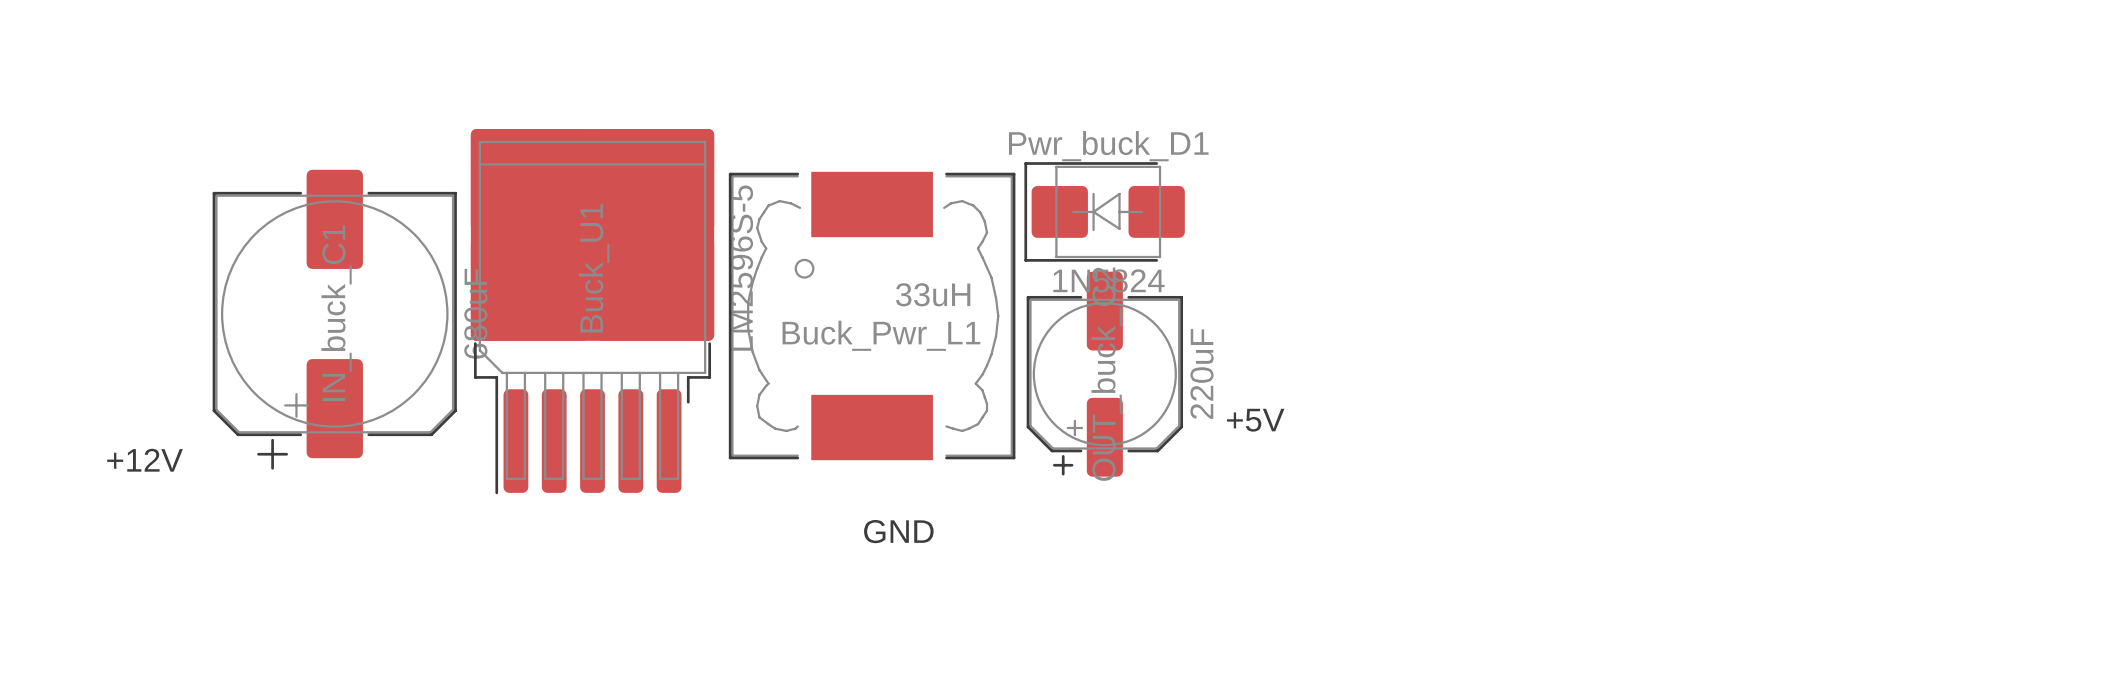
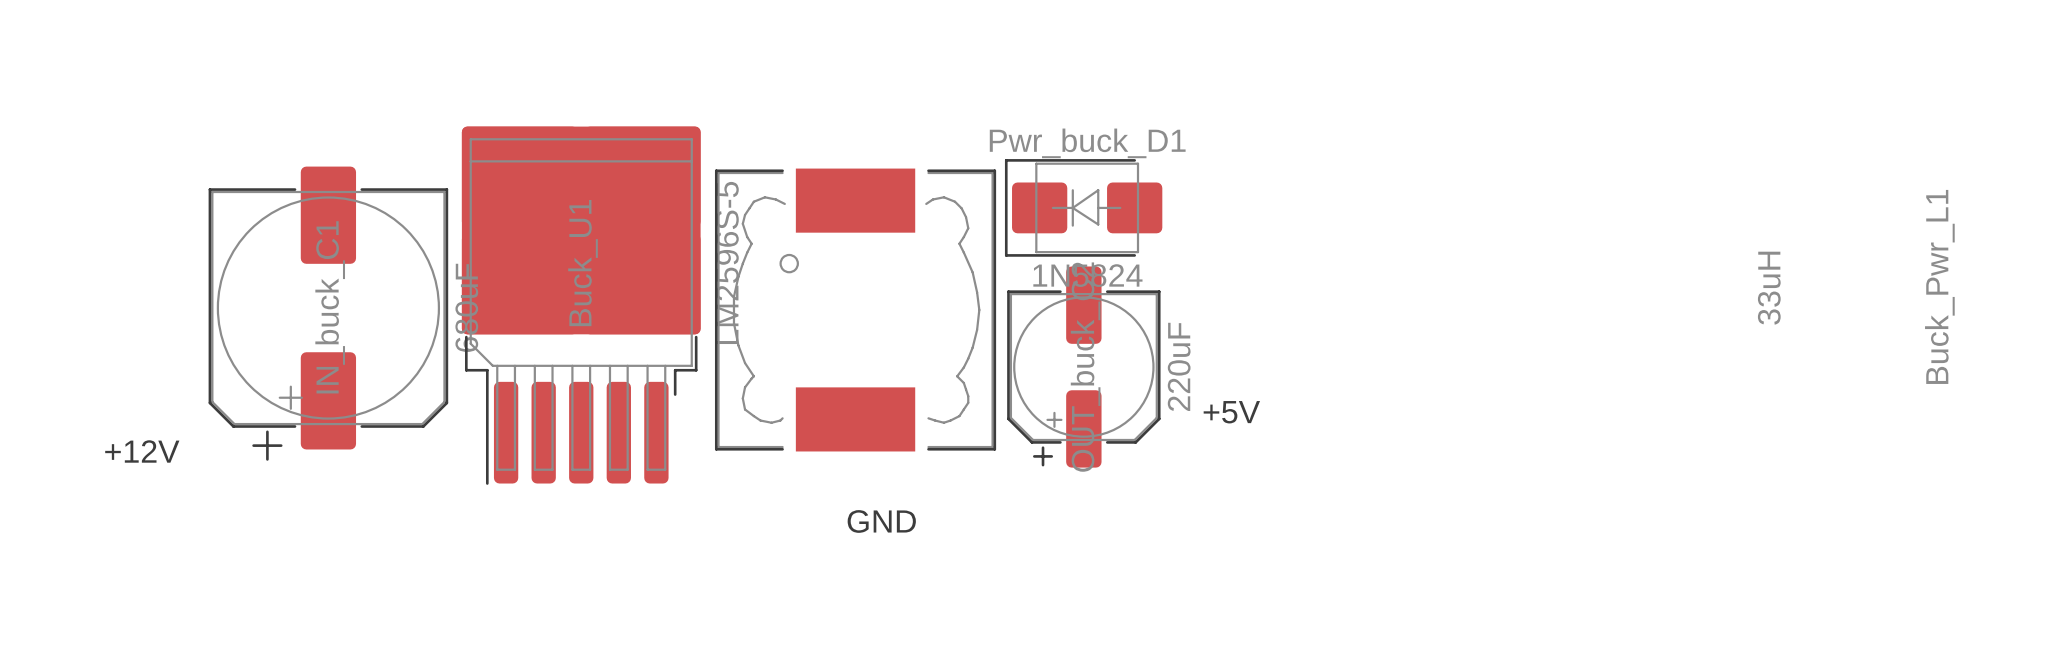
Buck_Pwr_L1 value rotation: 0° (933, 294) -> 90° counterclockwise (1769, 288)
Buck_Pwr_L1 value position: 33uH (933, 294) -> 33uH (1769, 288)
Buck_Pwr_L1 name rotation: 0° (881, 335) -> 90° counterclockwise (1939, 286)
Buck_Pwr_L1 name position: Buck_Pwr_L1 (881, 335) -> Buck_Pwr_L1 (1939, 286)

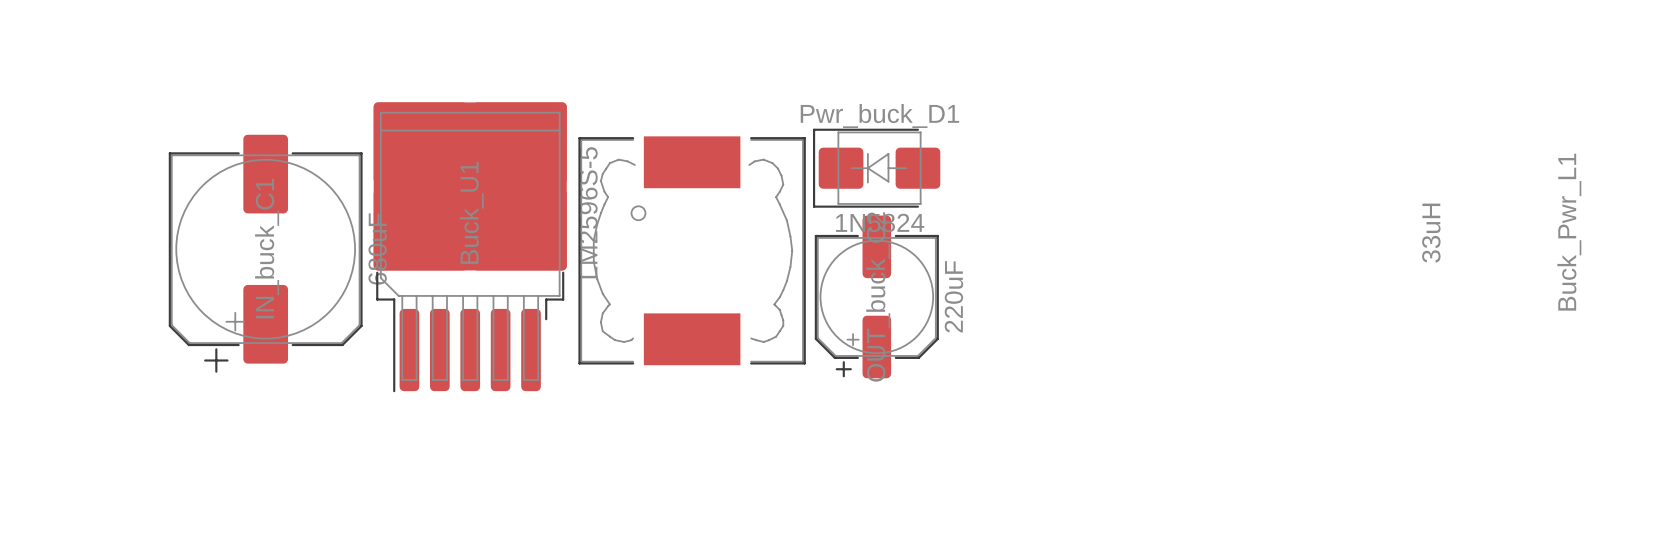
text: +5V (1231, 412) -> none
text: +12V (142, 451) -> none
text: GND (881, 521) -> none

